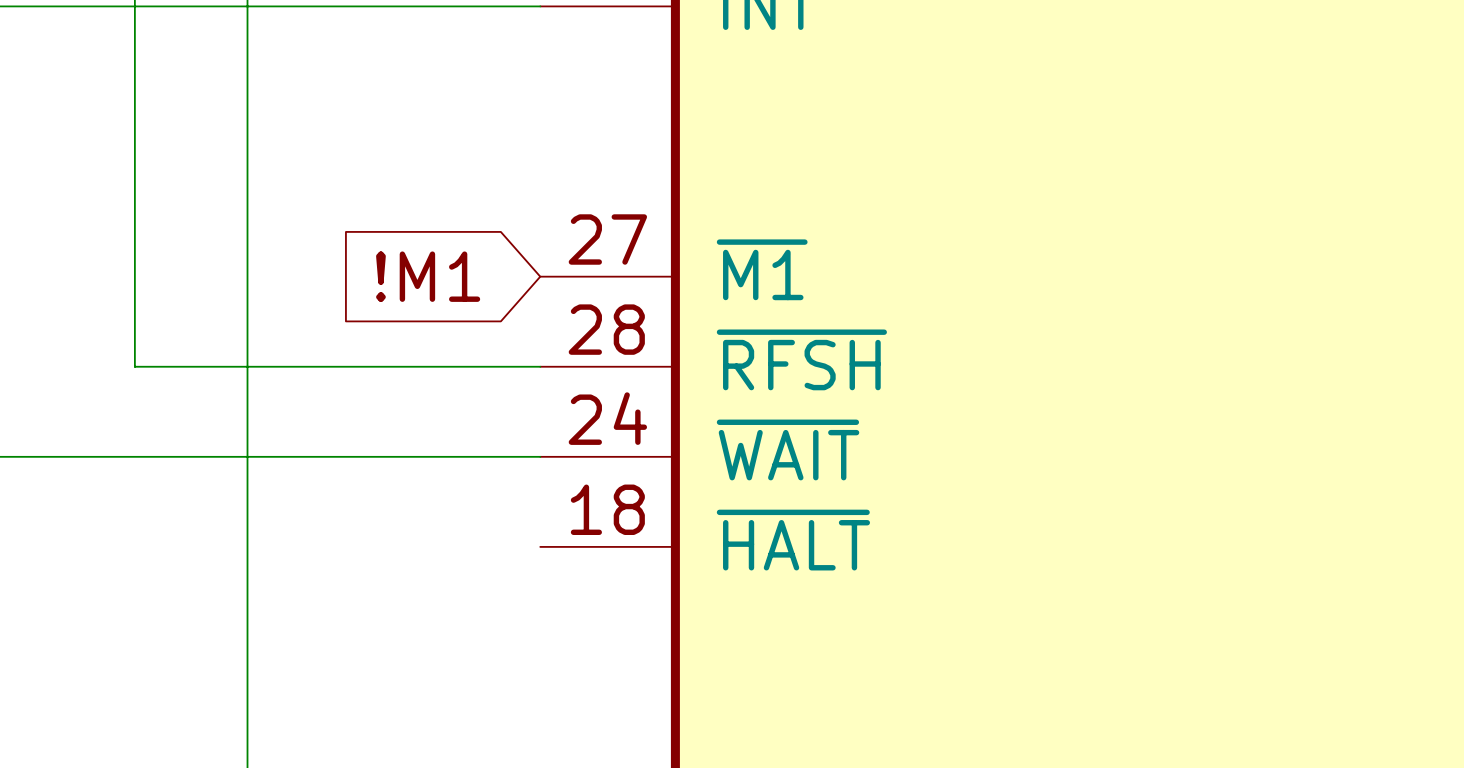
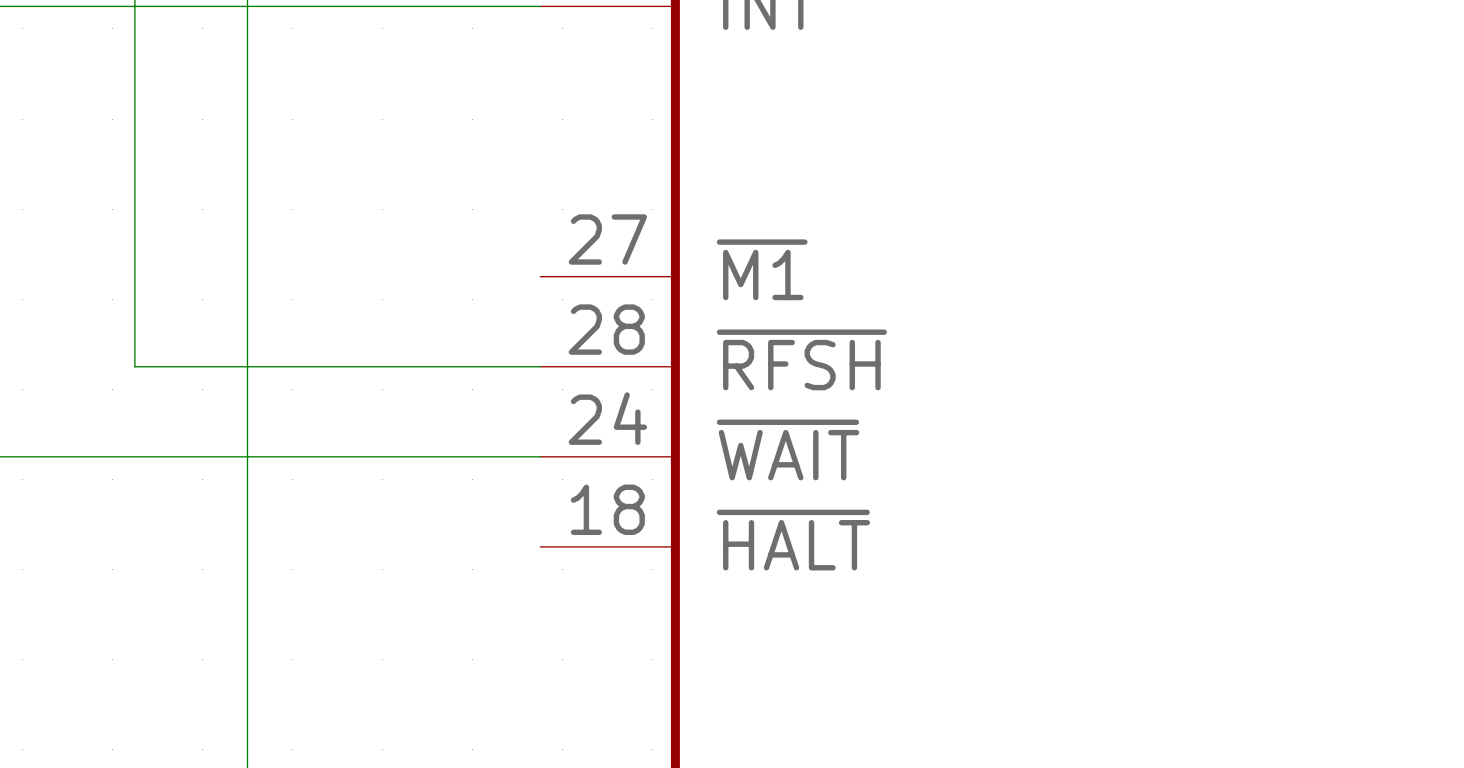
global label: !M1 (428, 276) -> none

